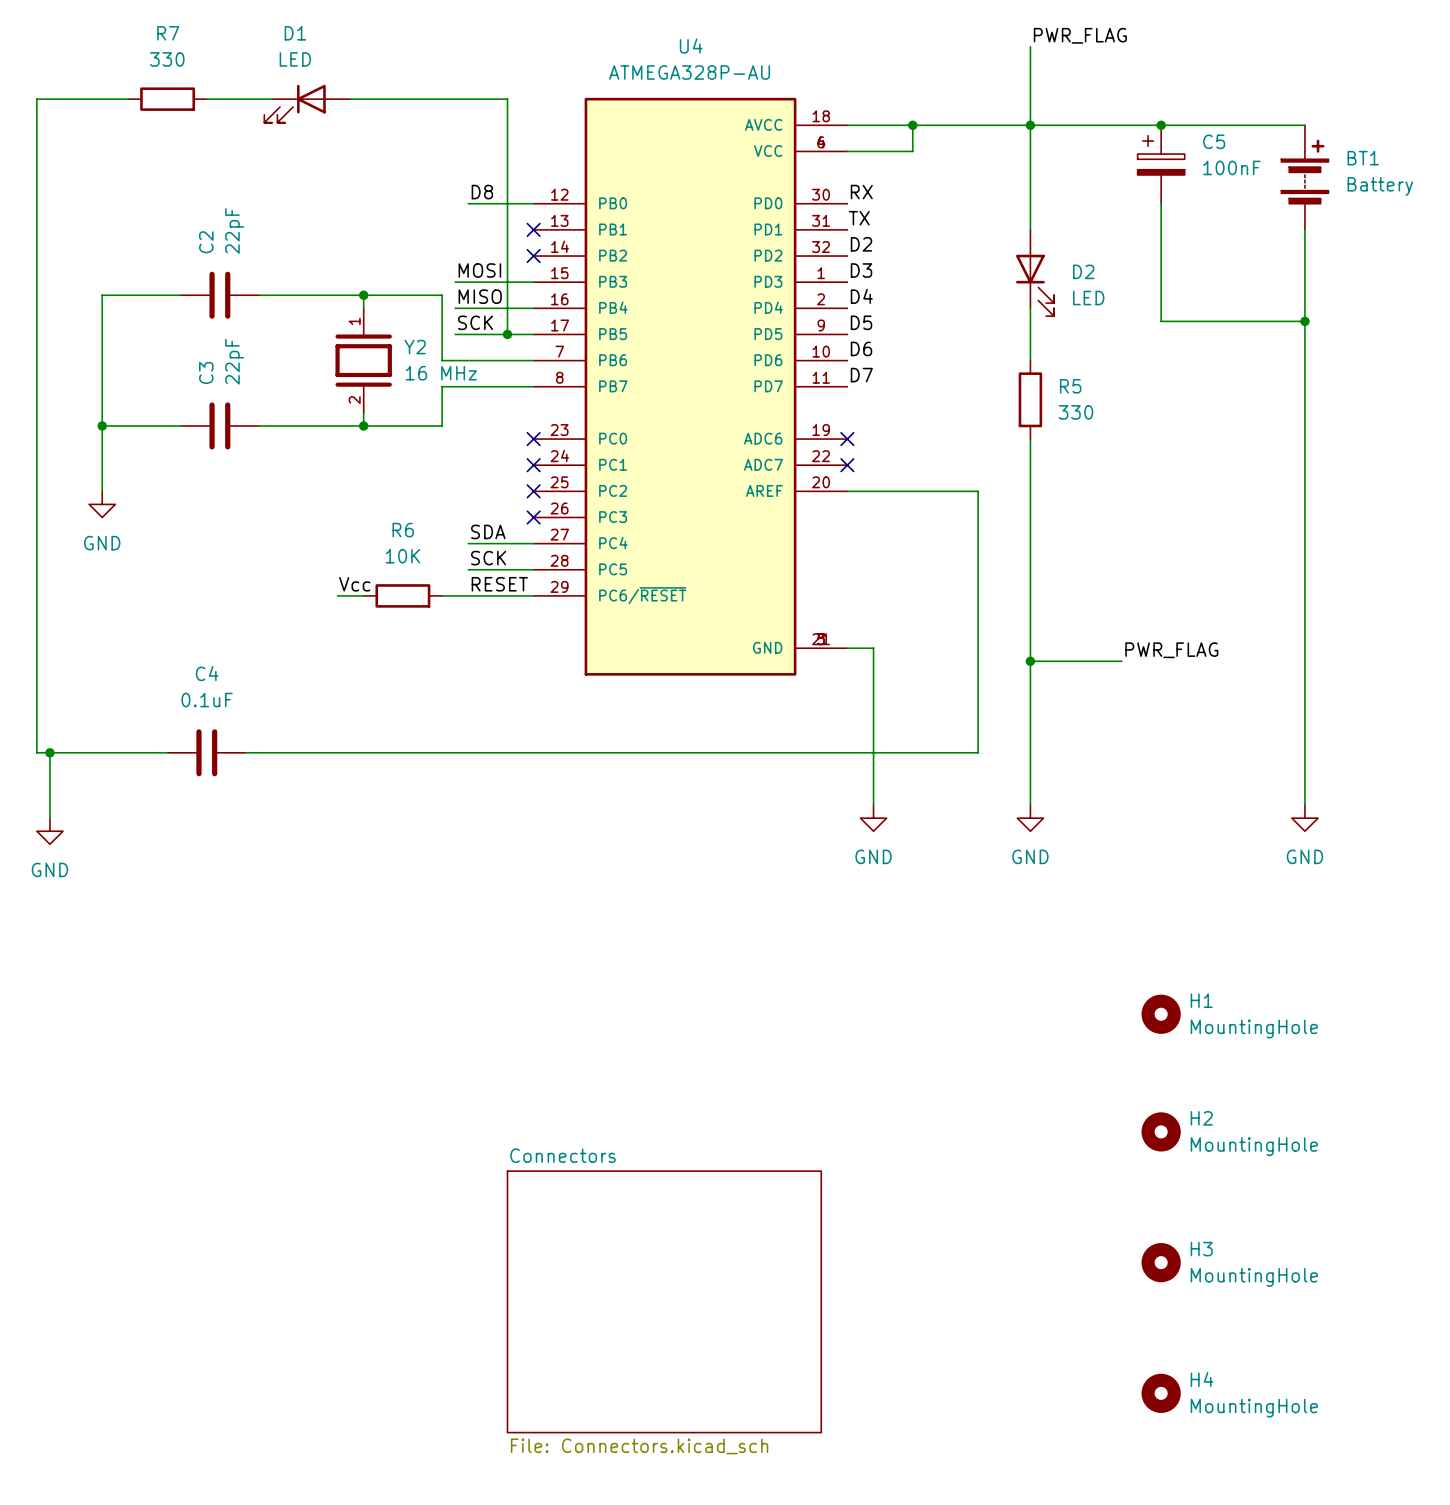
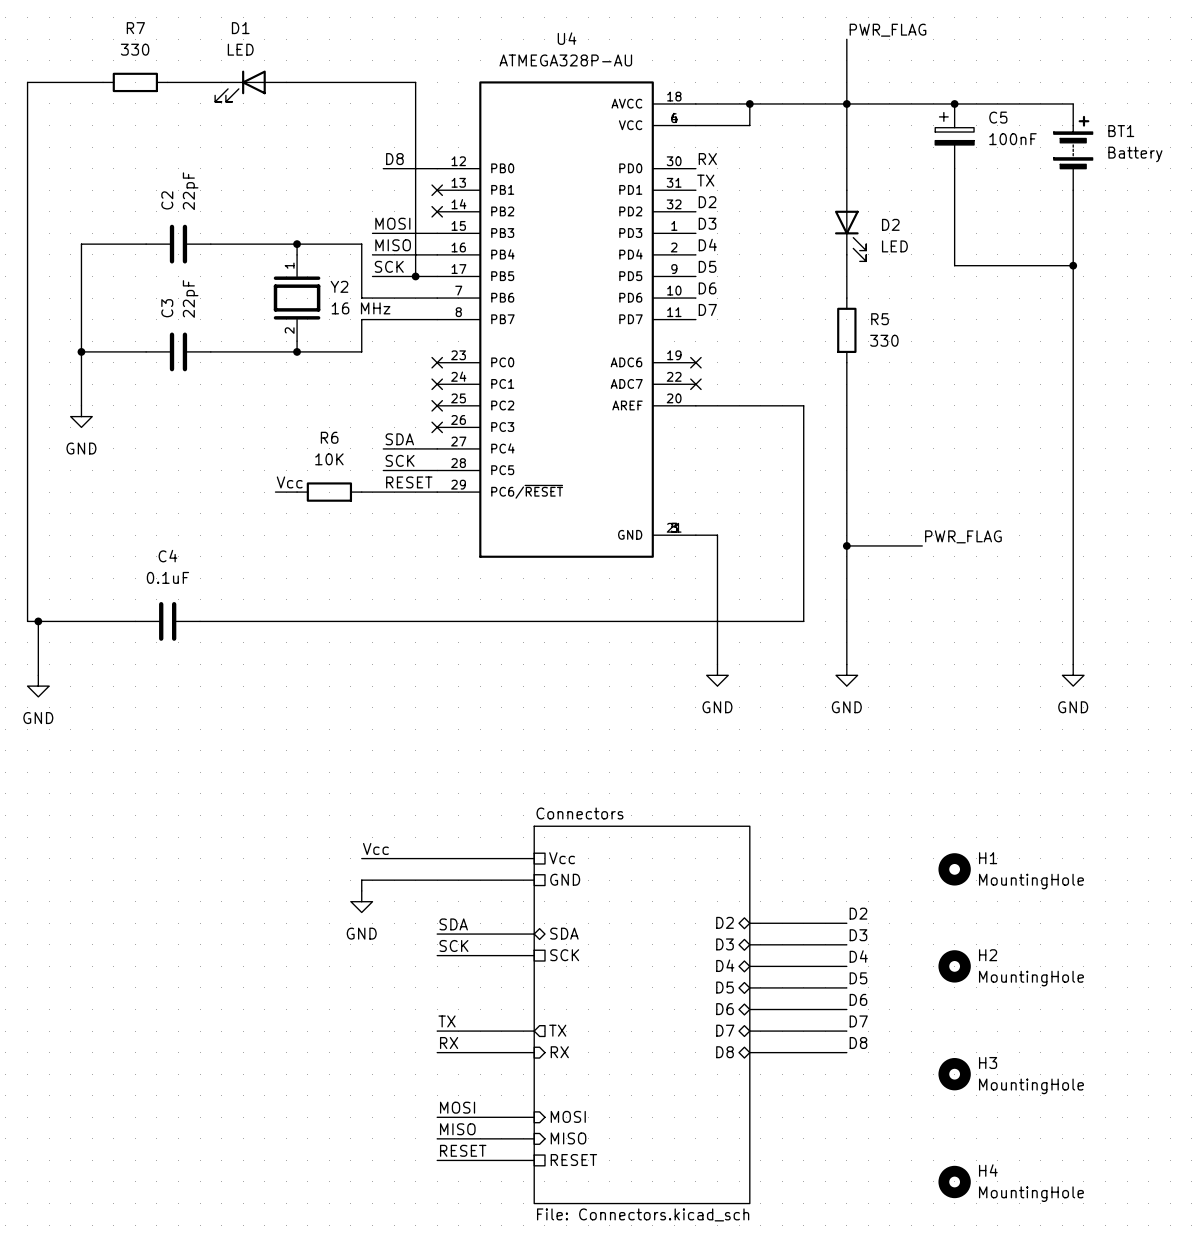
H1 position: (1161, 1014) -> (954, 869)
label: none -> Vcc (375, 848)
sheet pin: none -> Vcc (562, 858)
wire: none -> (361, 858) (534, 858)
wire: none -> (534, 880) (361, 880) (361, 890)
sheet pin: none -> GND (565, 879)
power symbol: none -> GND (361, 901)
label: none -> D2 (858, 913)
sheet pin: none -> D2 (725, 922)
wire: none -> (749, 923) (846, 923)
label: none -> SDA (453, 924)
wire: none -> (437, 934) (534, 934)
sheet pin: none -> SDA (564, 933)
H2 position: (1161, 1131) -> (954, 966)
label: none -> D3 (858, 935)
sheet pin: none -> D3 (725, 944)
wire: none -> (749, 944) (846, 944)
label: none -> SCK (453, 945)
sheet pin: none -> SCK (564, 955)
wire: none -> (437, 955) (534, 955)
label: none -> D4 (858, 956)
sheet pin: none -> D4 (725, 965)
wire: none -> (749, 966) (846, 966)
label: none -> D5 (858, 978)
sheet pin: none -> D5 (725, 987)
wire: none -> (749, 987) (846, 987)
label: none -> D6 (858, 999)
sheet pin: none -> D6 (725, 1009)
wire: none -> (749, 1009) (846, 1009)
sheet Connectors: none -> File: Connectors.kicad_sch (642, 1014)
label: none -> TX (447, 1021)
label: none -> D7 (858, 1021)
wire: none -> (437, 1031) (534, 1031)
sheet pin: none -> TX (557, 1030)
sheet pin: none -> D7 (725, 1030)
wire: none -> (749, 1031) (846, 1031)
H3 position: (1161, 1262) -> (954, 1074)
label: none -> RX (449, 1043)
label: none -> D8 (858, 1043)
wire: none -> (437, 1052) (534, 1052)
sheet pin: none -> RX (559, 1052)
sheet pin: none -> D8 (725, 1052)
wire: none -> (749, 1052) (846, 1052)
sheet Connectors: File: Connectors.kicad_sch (664, 1301) -> none
label: none -> MOSI (457, 1107)
sheet pin: none -> MOSI (568, 1116)
wire: none -> (437, 1117) (534, 1117)
label: none -> MISO (457, 1129)
sheet pin: none -> MISO (568, 1138)
wire: none -> (437, 1138) (534, 1138)
H4 position: (1161, 1393) -> (954, 1181)
label: none -> RESET (463, 1150)
sheet pin: none -> RESET (573, 1160)
wire: none -> (437, 1160) (534, 1160)

